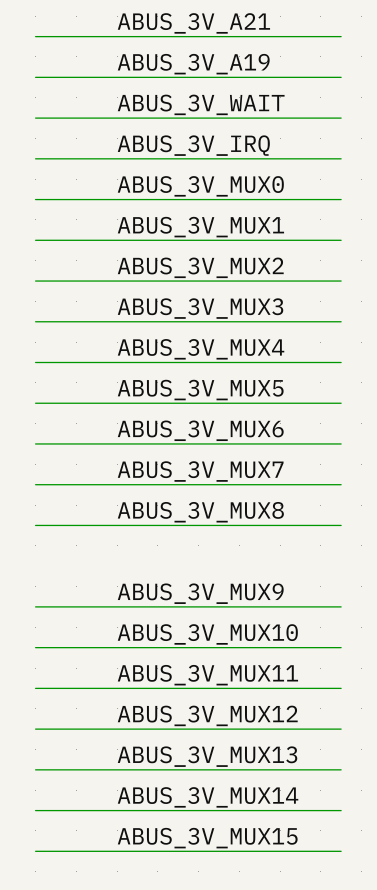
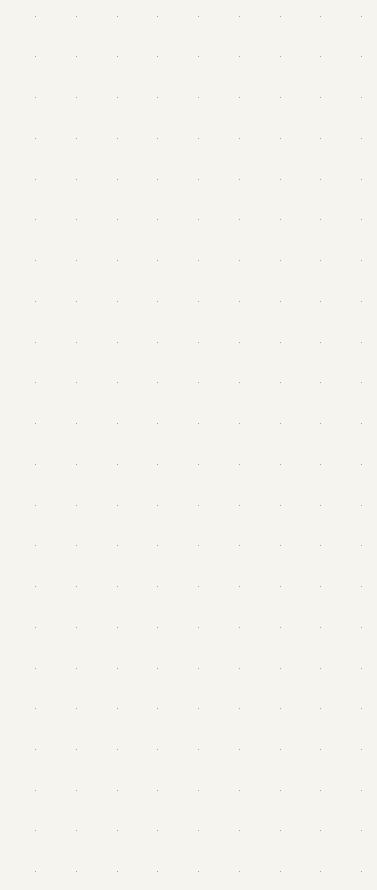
label: ABUS_3V_A21 (193, 23) -> none
wire: (35, 36) (341, 36) -> none
label: ABUS_3V_A19 (193, 64) -> none
wire: (35, 77) (341, 77) -> none
label: ABUS_3V_WAIT (201, 104) -> none
wire: (35, 118) (341, 118) -> none
label: ABUS_3V_IRQ (193, 145) -> none
wire: (35, 158) (341, 158) -> none
label: ABUS_3V_MUX0 (200, 186) -> none
wire: (35, 199) (341, 199) -> none
label: ABUS_3V_MUX1 (200, 227) -> none
wire: (35, 240) (341, 240) -> none
label: ABUS_3V_MUX2 (200, 267) -> none
wire: (35, 281) (341, 281) -> none
label: ABUS_3V_MUX3 (200, 308) -> none
wire: (35, 321) (341, 321) -> none
label: ABUS_3V_MUX4 (201, 349) -> none
wire: (35, 362) (341, 362) -> none
label: ABUS_3V_MUX5 (200, 390) -> none
wire: (35, 403) (341, 403) -> none
label: ABUS_3V_MUX6 (200, 430) -> none
wire: (35, 443) (341, 443) -> none
label: ABUS_3V_MUX7 (200, 471) -> none
wire: (35, 484) (341, 484) -> none
label: ABUS_3V_MUX8 (200, 512) -> none
wire: (35, 525) (341, 525) -> none
label: ABUS_3V_MUX9 (200, 593) -> none
wire: (35, 606) (341, 606) -> none
label: ABUS_3V_MUX10 (207, 634) -> none
wire: (35, 647) (341, 647) -> none
label: ABUS_3V_MUX11 (207, 675) -> none
wire: (35, 688) (341, 688) -> none
label: ABUS_3V_MUX12 (207, 715) -> none
wire: (35, 729) (341, 729) -> none
label: ABUS_3V_MUX13 (207, 756) -> none
wire: (35, 769) (341, 769) -> none
label: ABUS_3V_MUX14 (208, 797) -> none
wire: (35, 810) (341, 810) -> none
label: ABUS_3V_MUX15 (207, 838) -> none
wire: (35, 851) (341, 851) -> none

